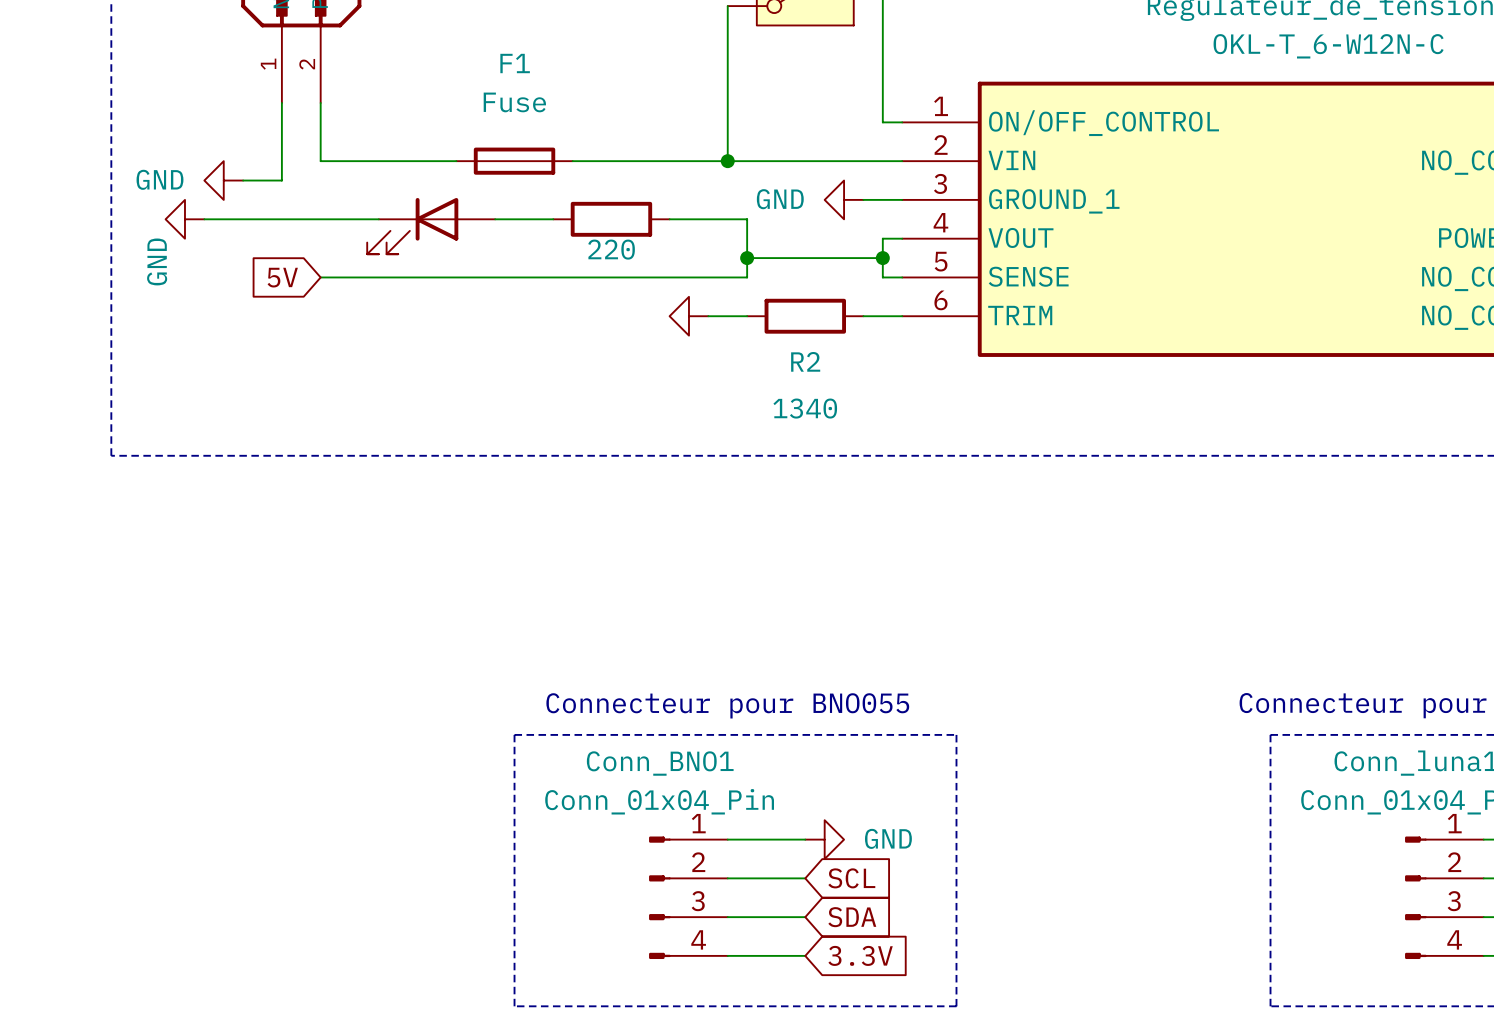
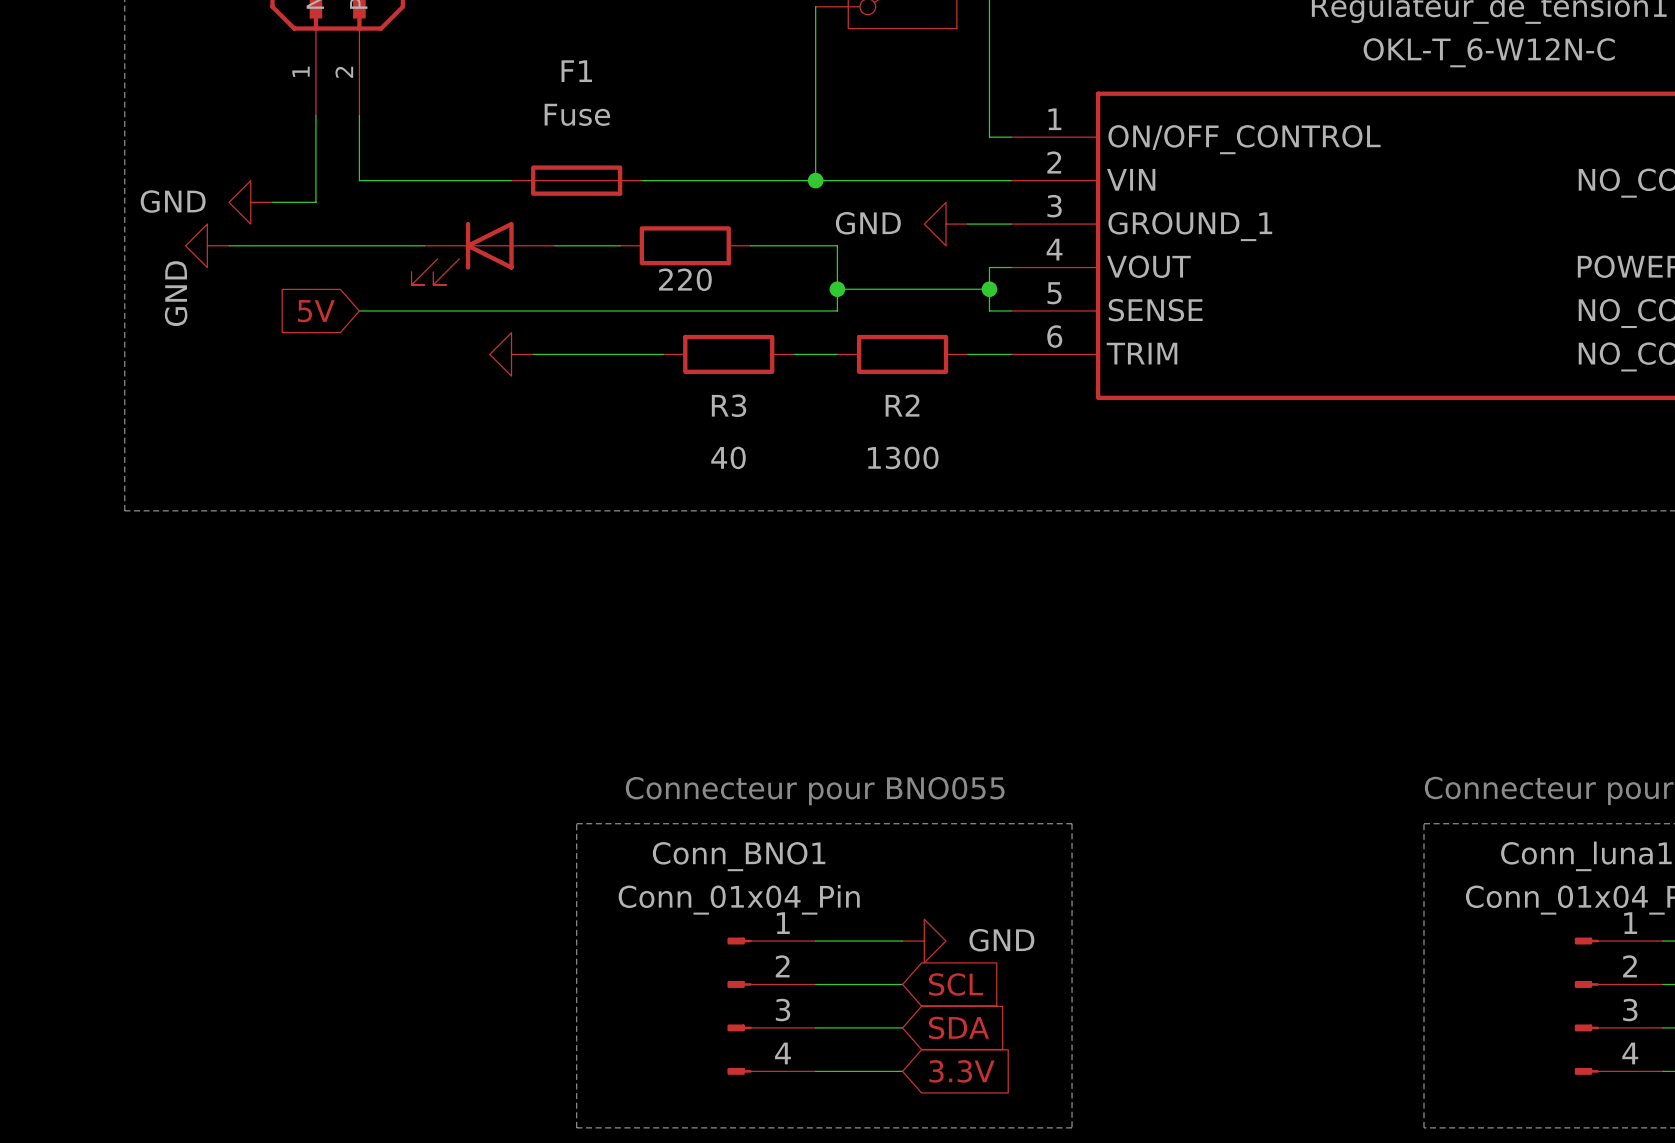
wire: none -> (533, 354) (663, 354)
R3: none -> 40 (728, 354)
power symbol position: (688, 316) -> (511, 354)
R2 value: 1340 (805, 408) -> 1300 (903, 457)

